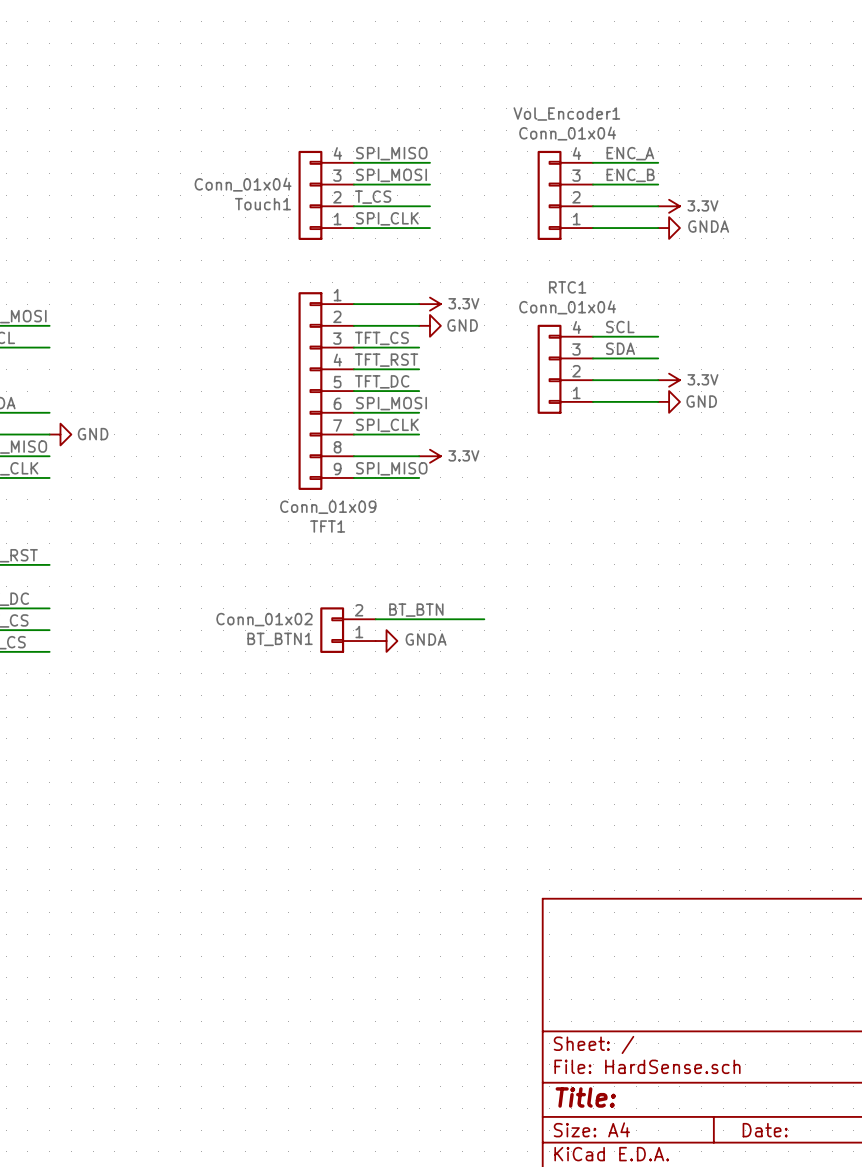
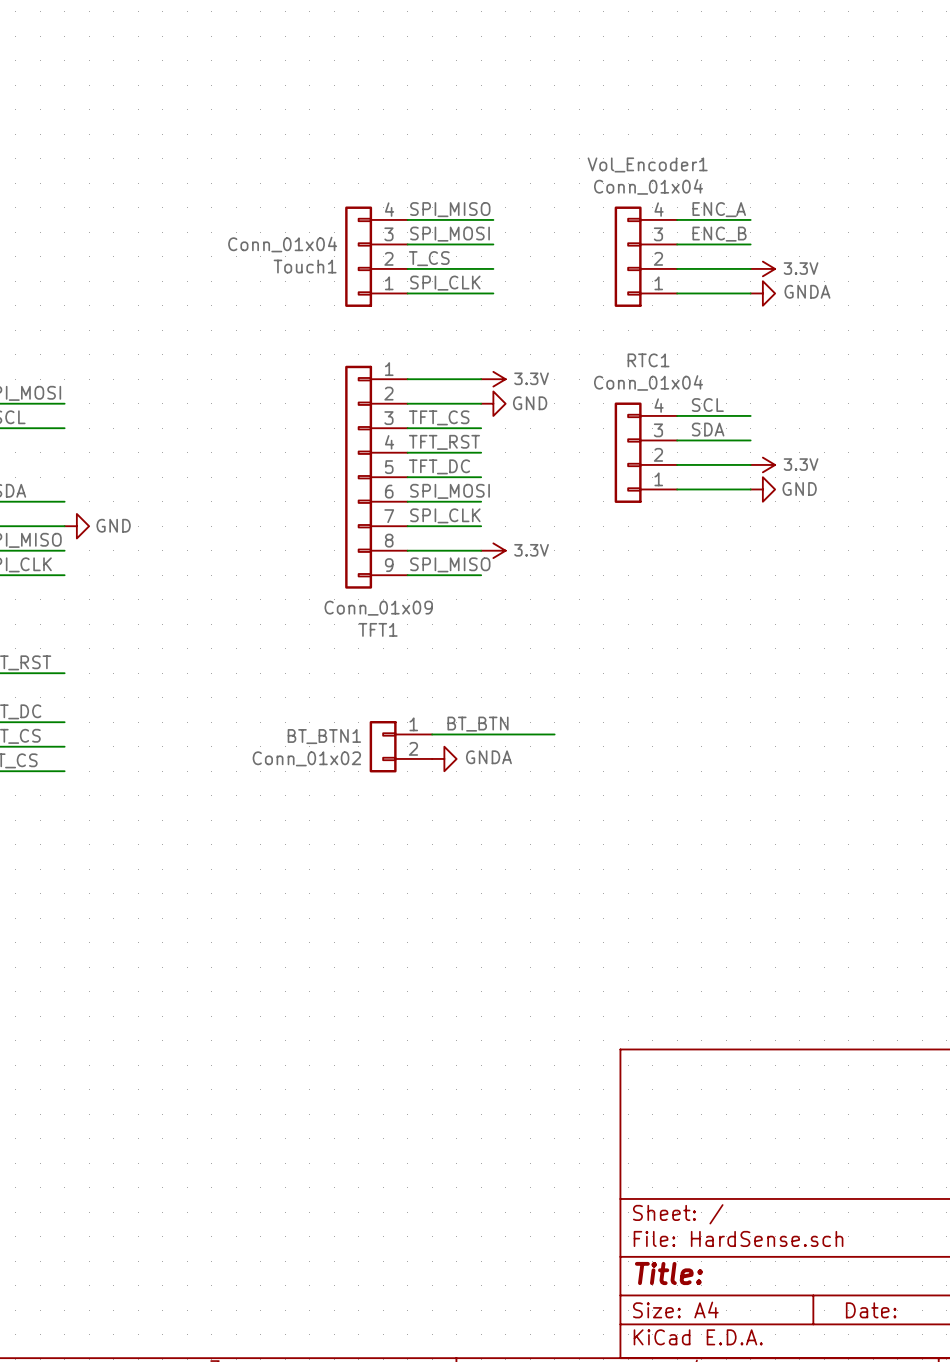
BT_BTN1 flip: as is (332, 630) -> up-down (383, 746)

